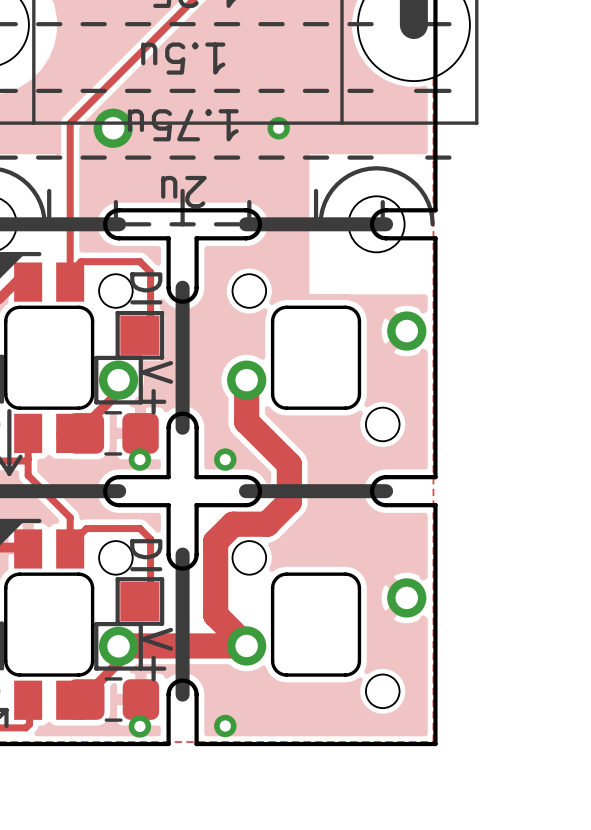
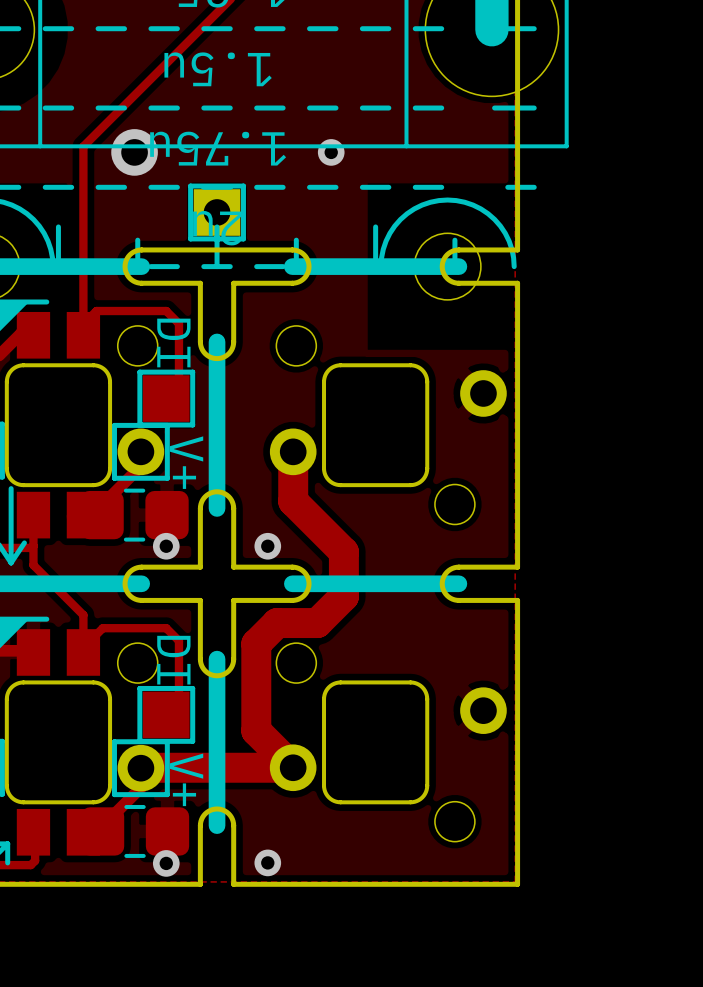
part: none -> (217, 212)

